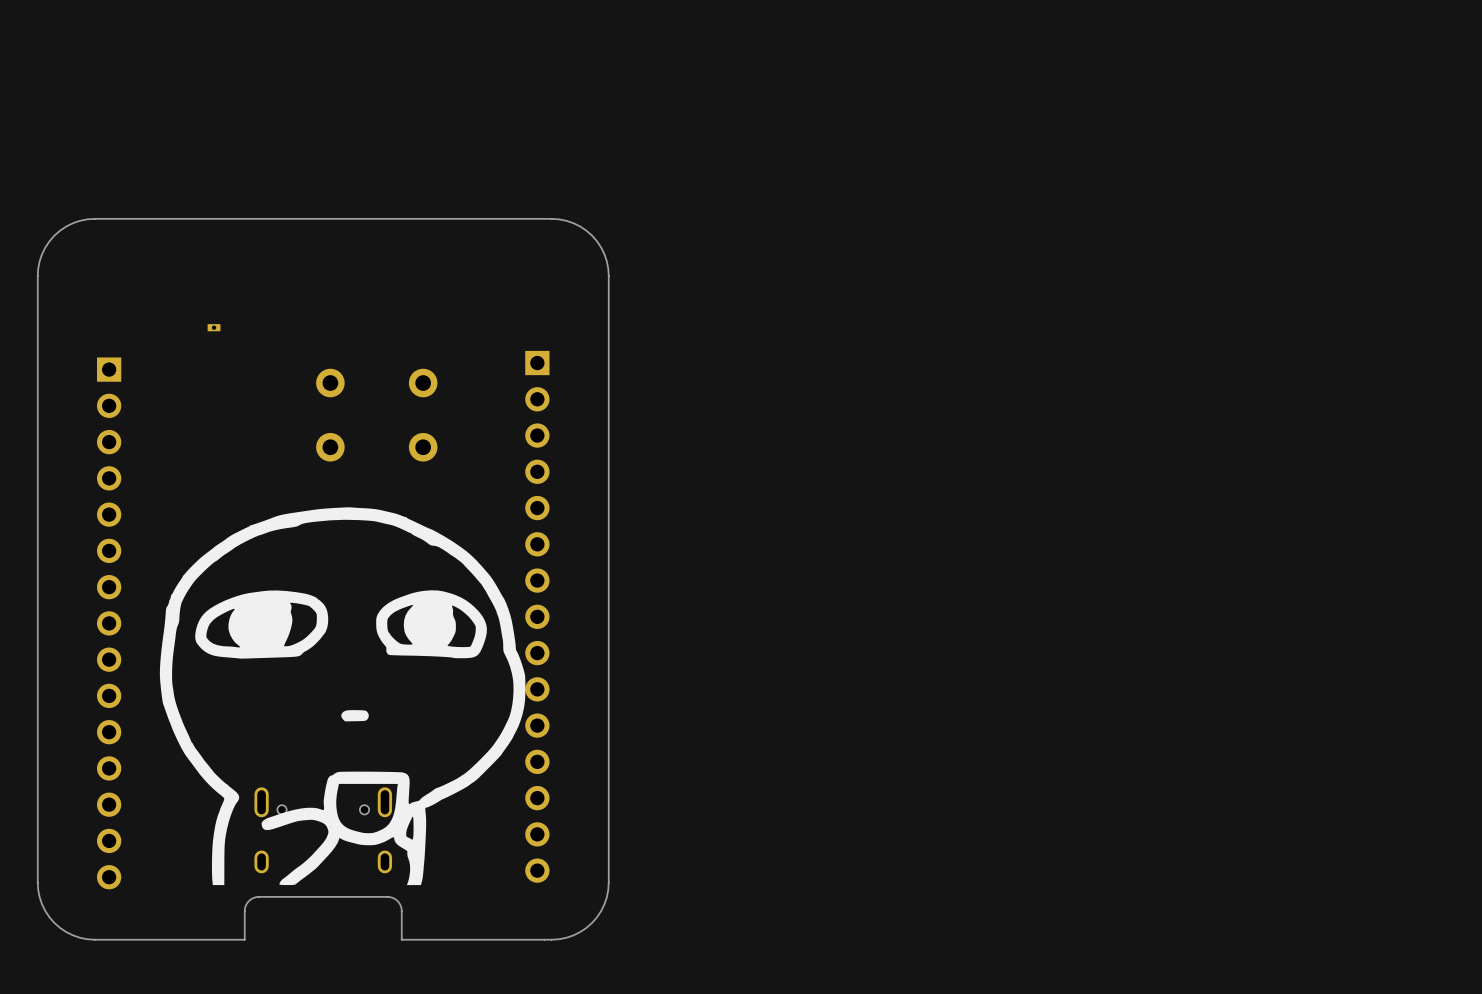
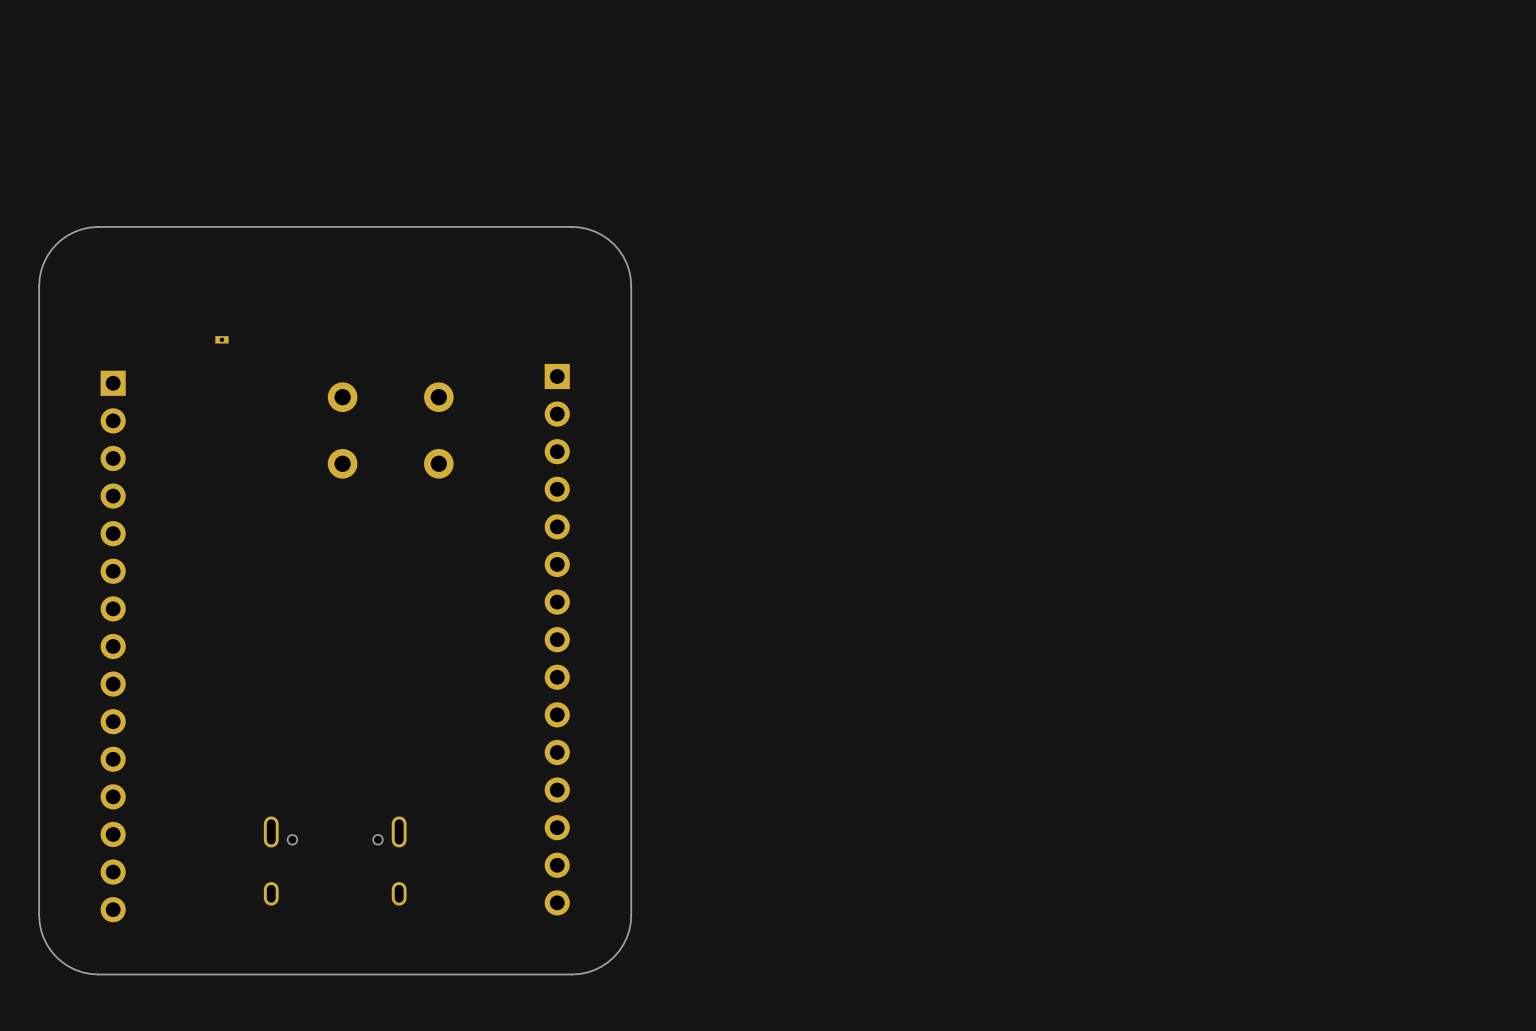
drawing: [159, 507, 526, 886] -> none
board edge: (401, 939) (400, 906) (395, 899) (387, 896) (254, 897) (248, 901) (245, 908) (244, 939) -> (416, 974) (253, 974)

